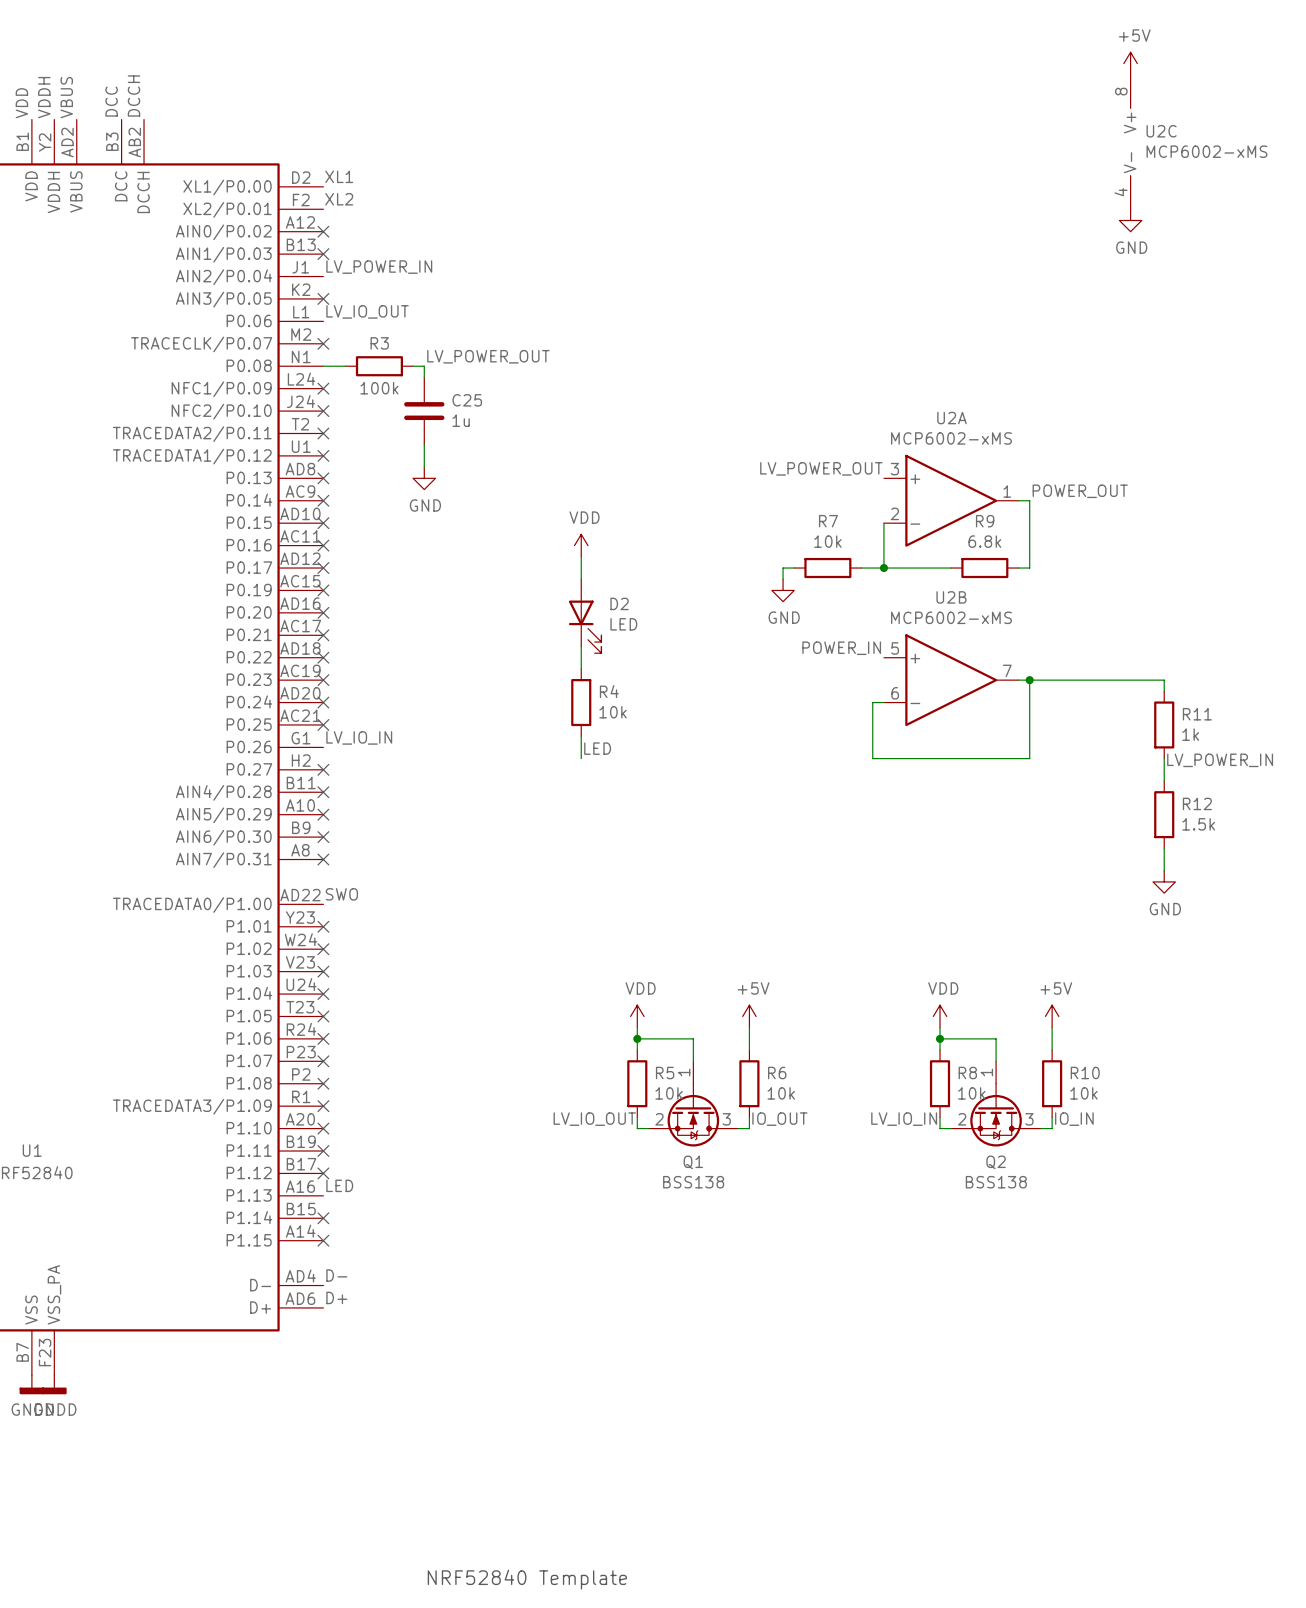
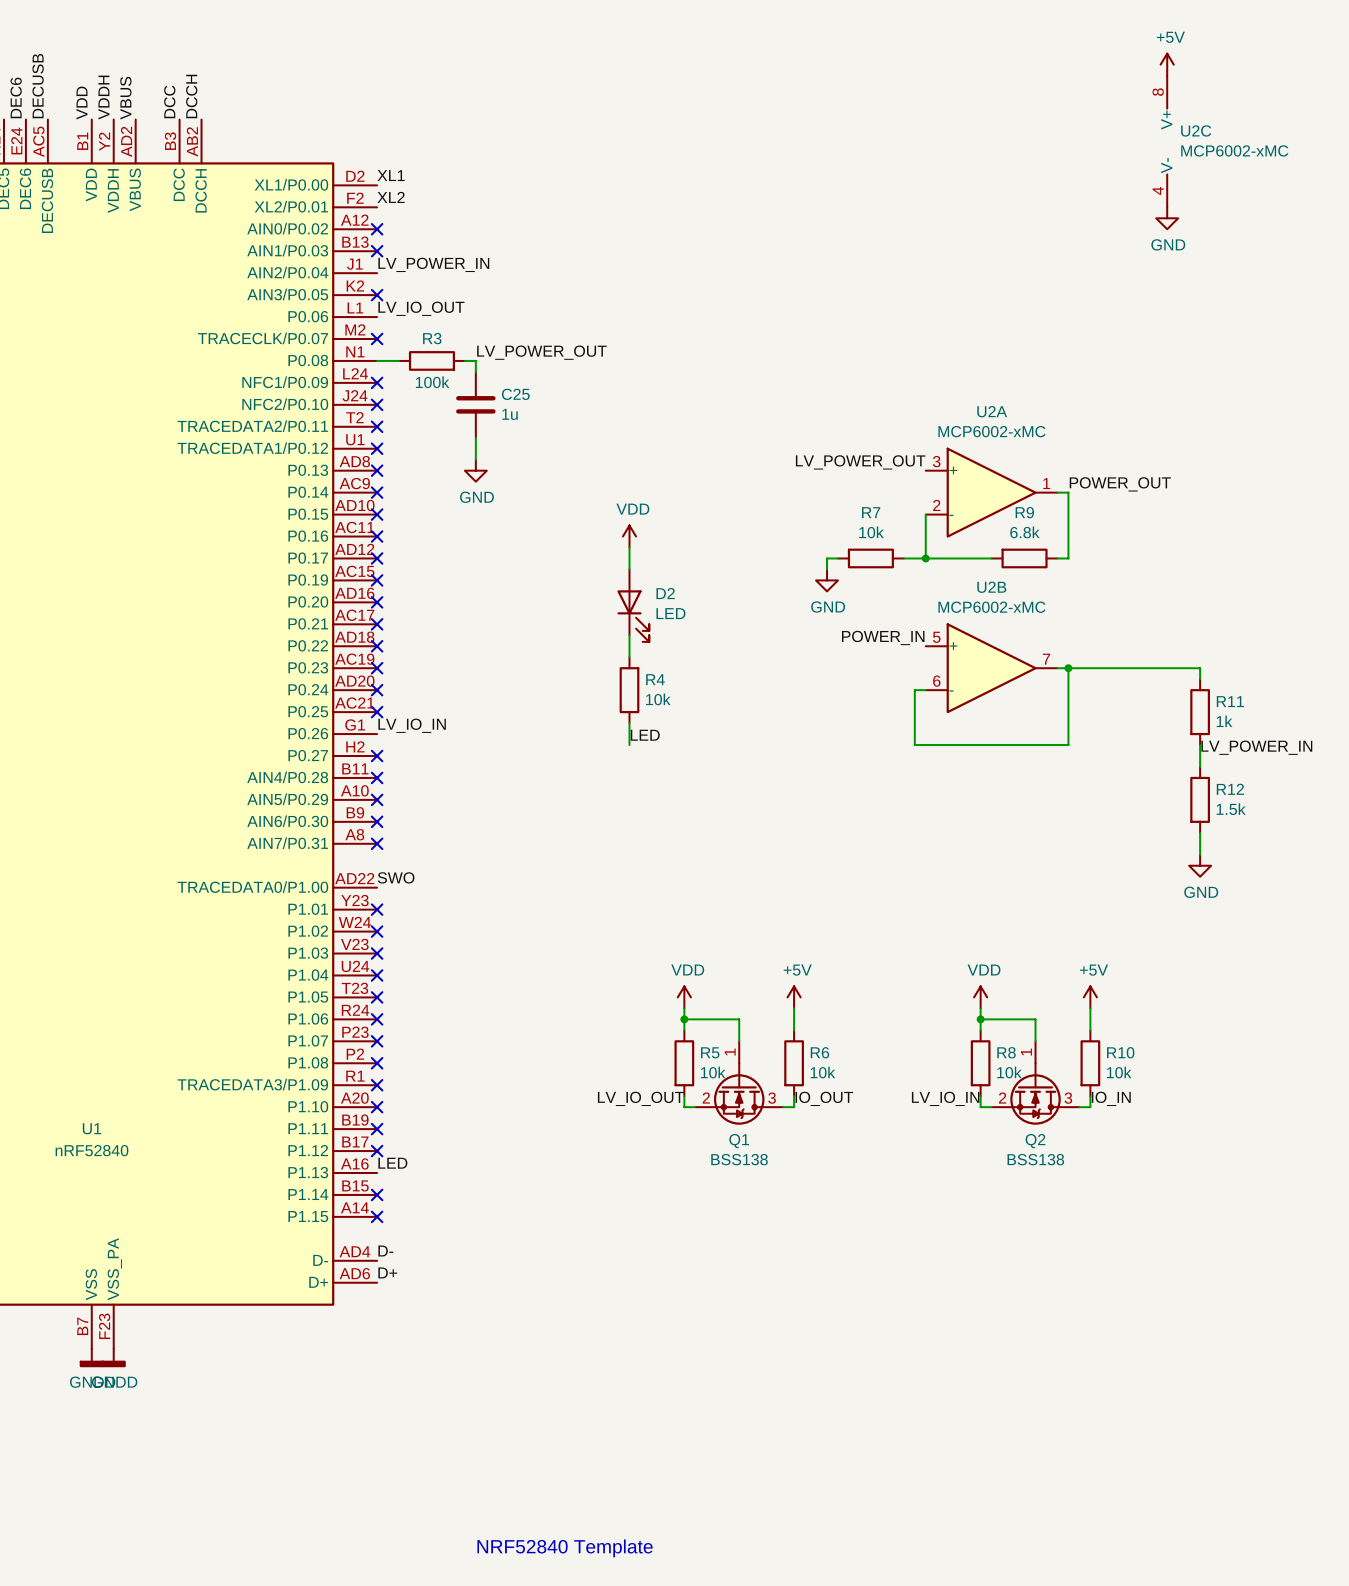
U2C value: MCP6002-xMS (1206, 151) -> MCP6002-xMC (1234, 150)
U2A value: MCP6002-xMS (951, 438) -> MCP6002-xMC (991, 431)
U2B value: MCP6002-xMS (951, 617) -> MCP6002-xMC (991, 607)

